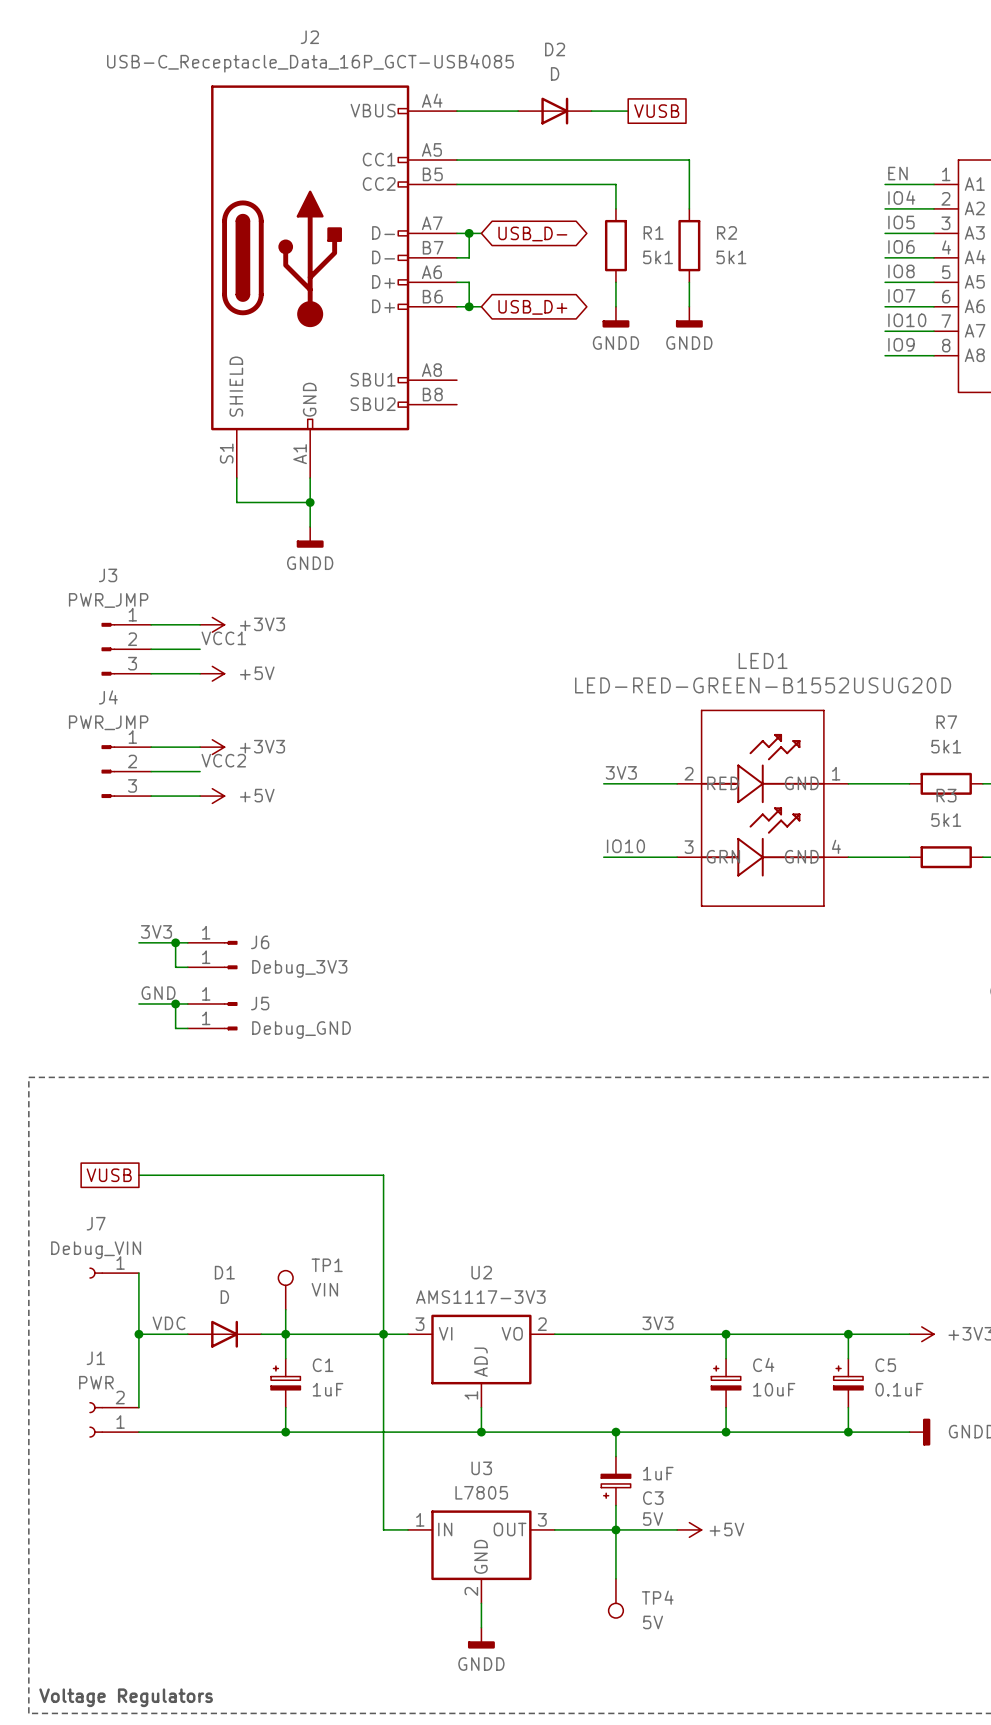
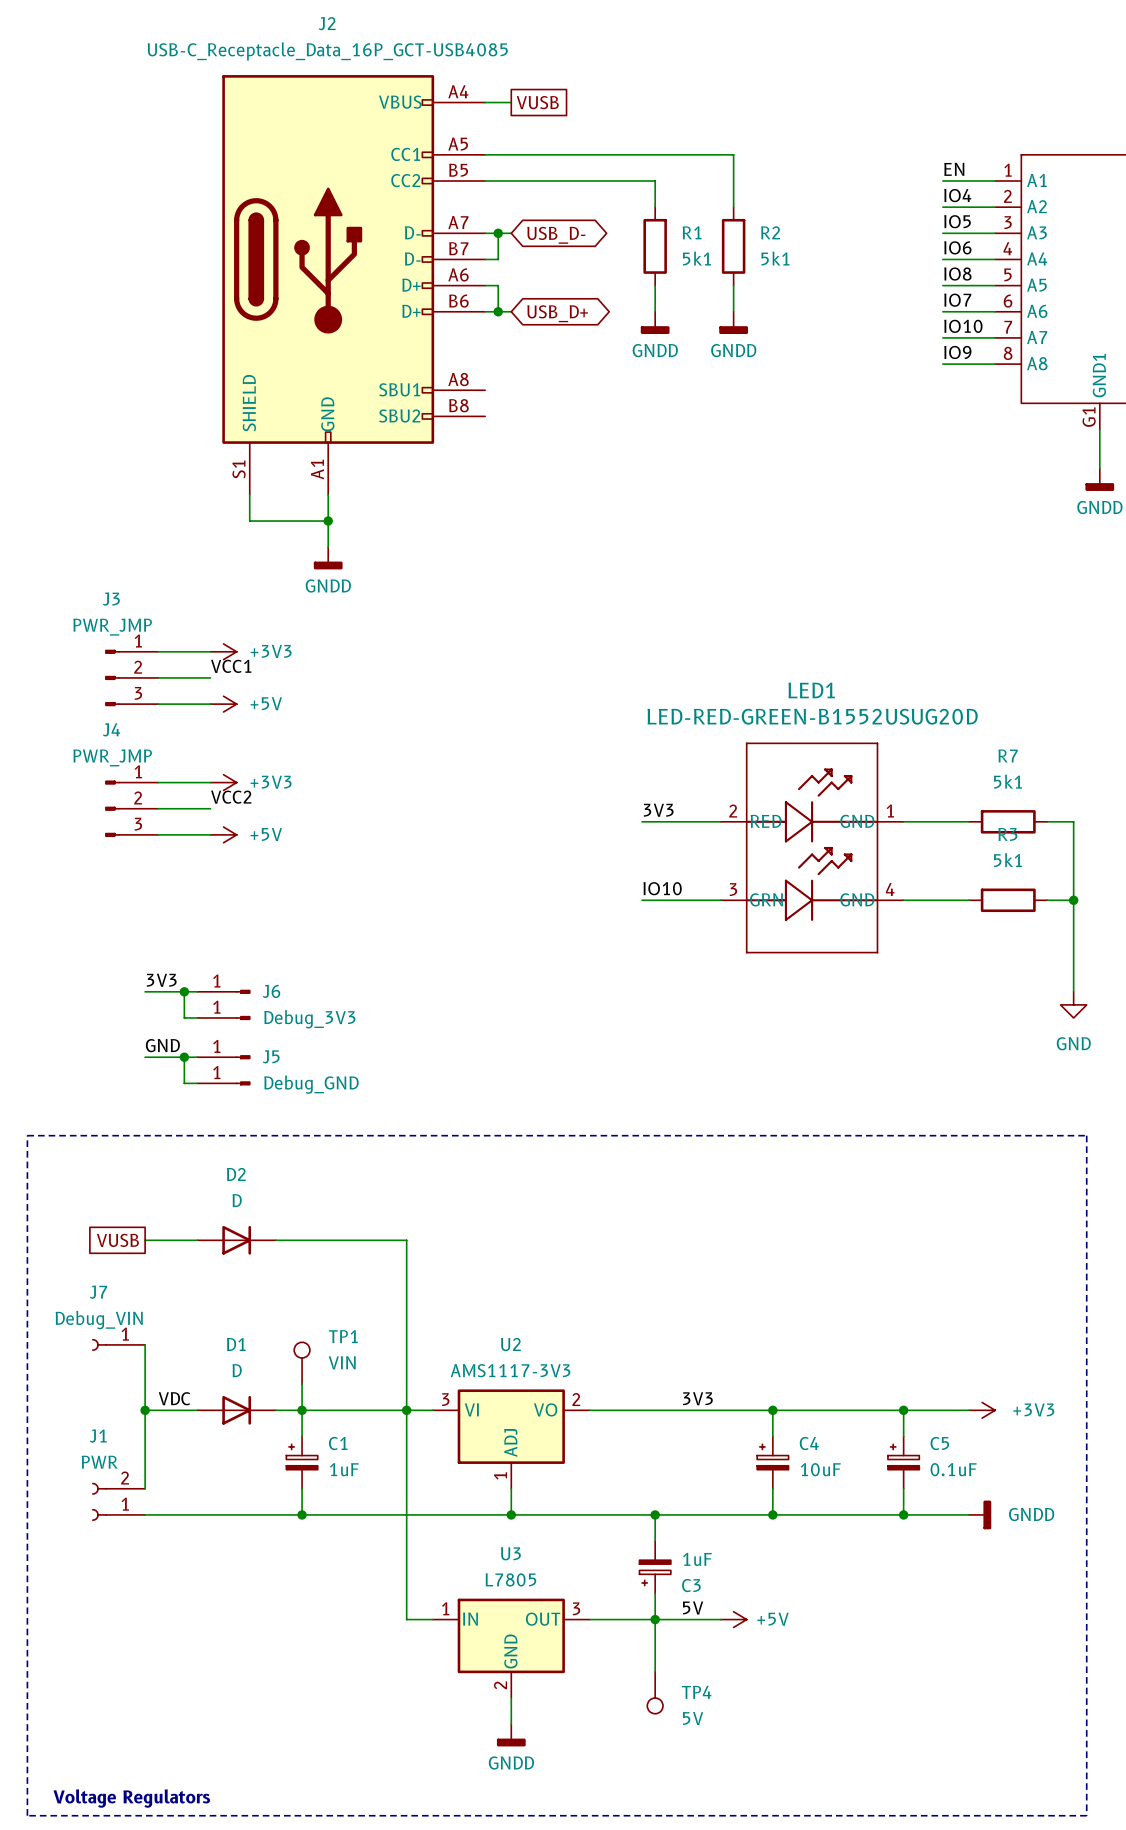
wire: (481, 111) (518, 111) -> none
D2 position: (554, 111) -> (236, 1240)
wire: (591, 111) (628, 111) -> none
global label position: VUSB (656, 111) -> VUSB (537, 102)

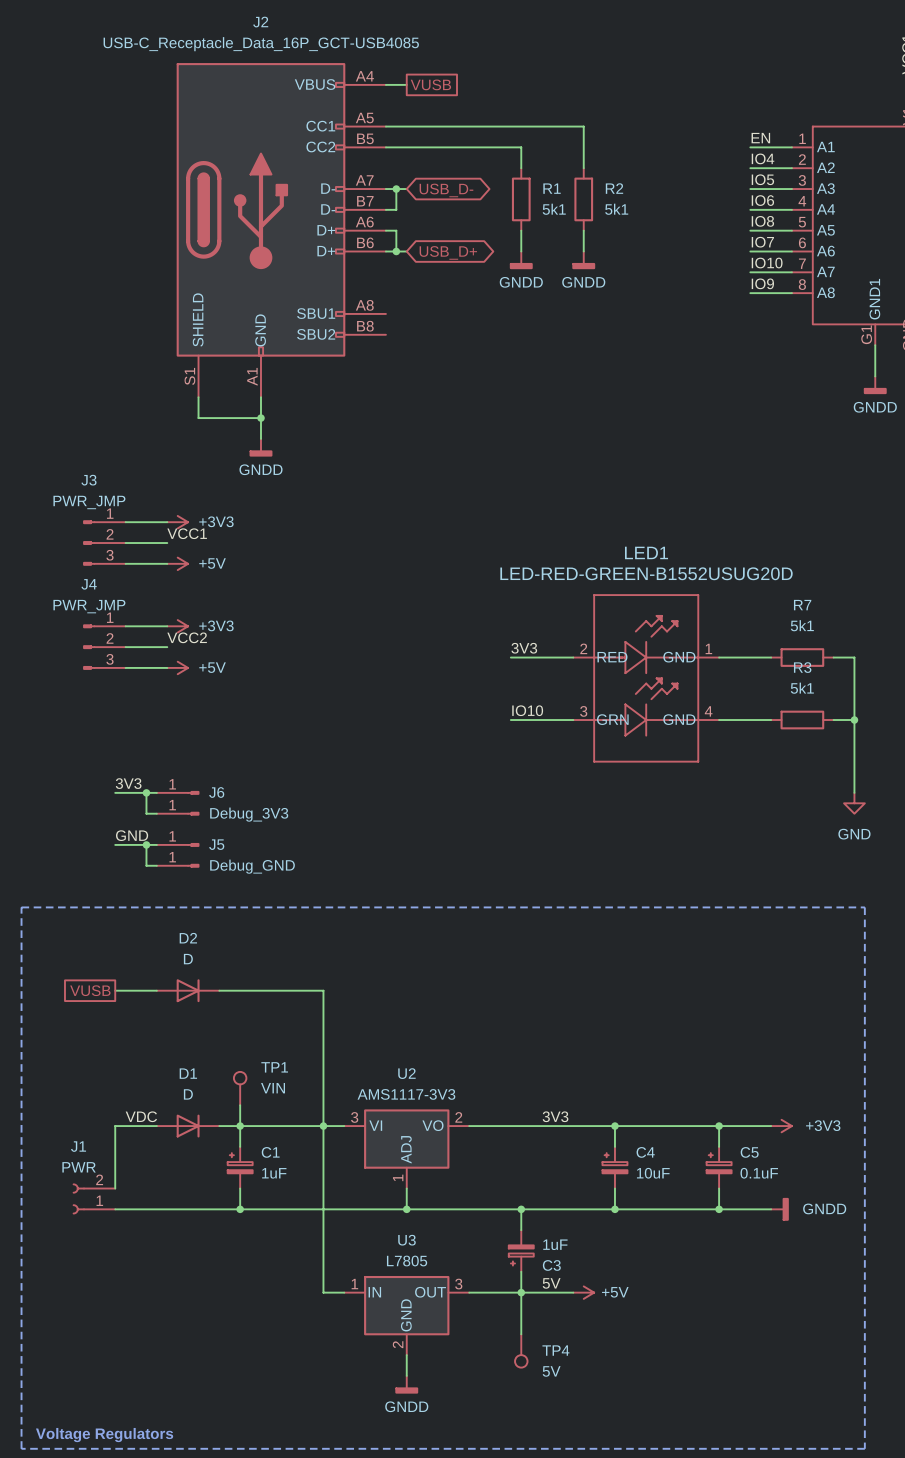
J7: Debug_VIN (118, 1344) -> none
wire: (145, 1344) (145, 1410) -> none
junction: (145, 1410) -> none

